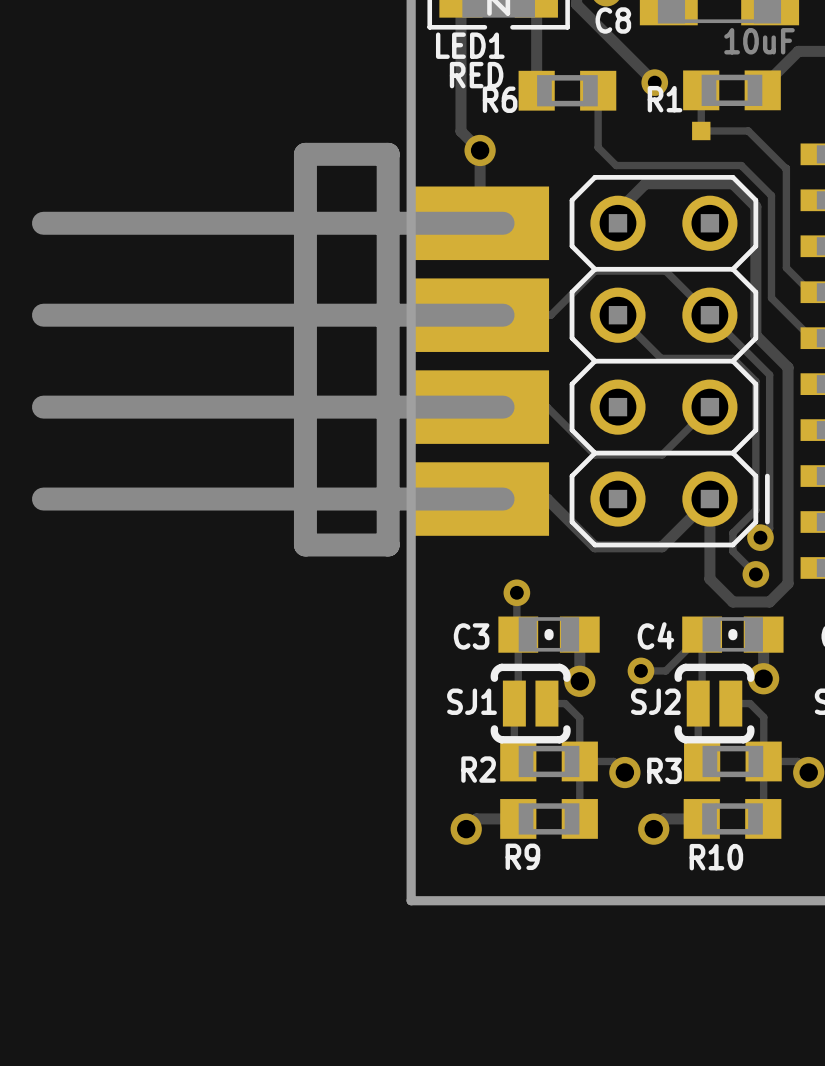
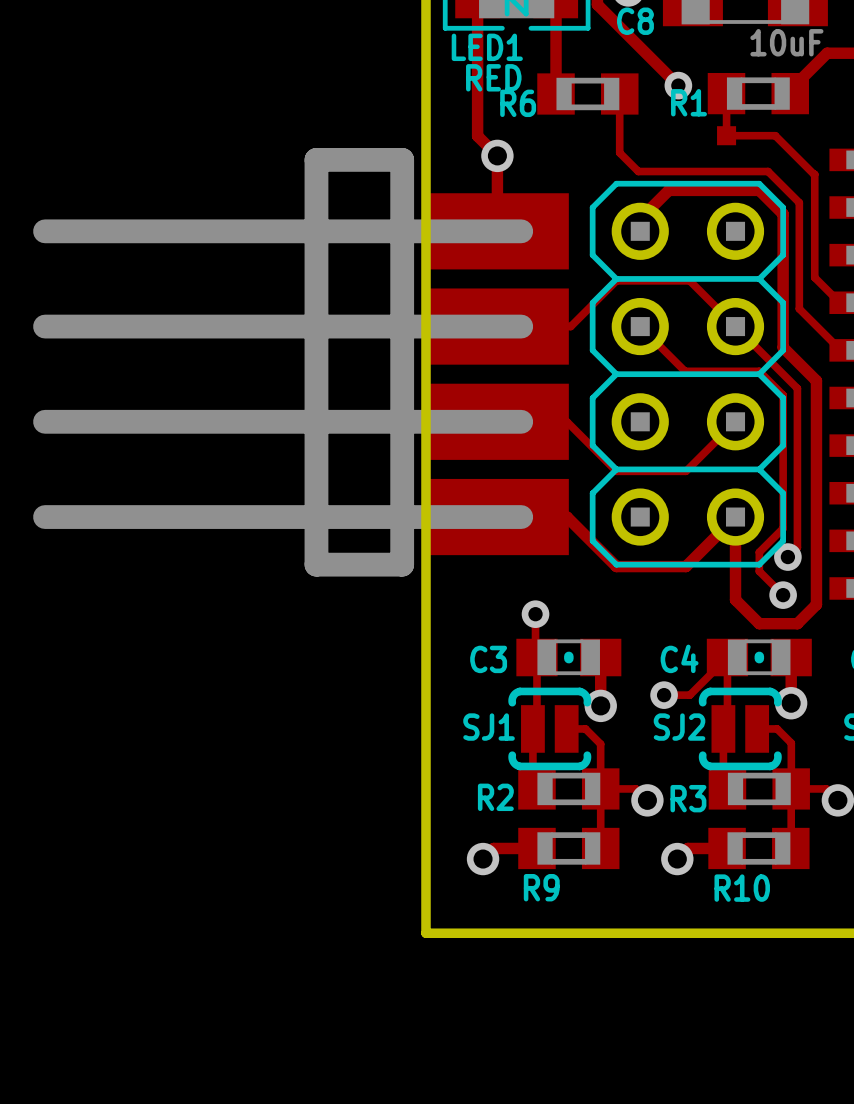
part footprint: [569, 175, 770, 548] -> [589, 180, 786, 568]

